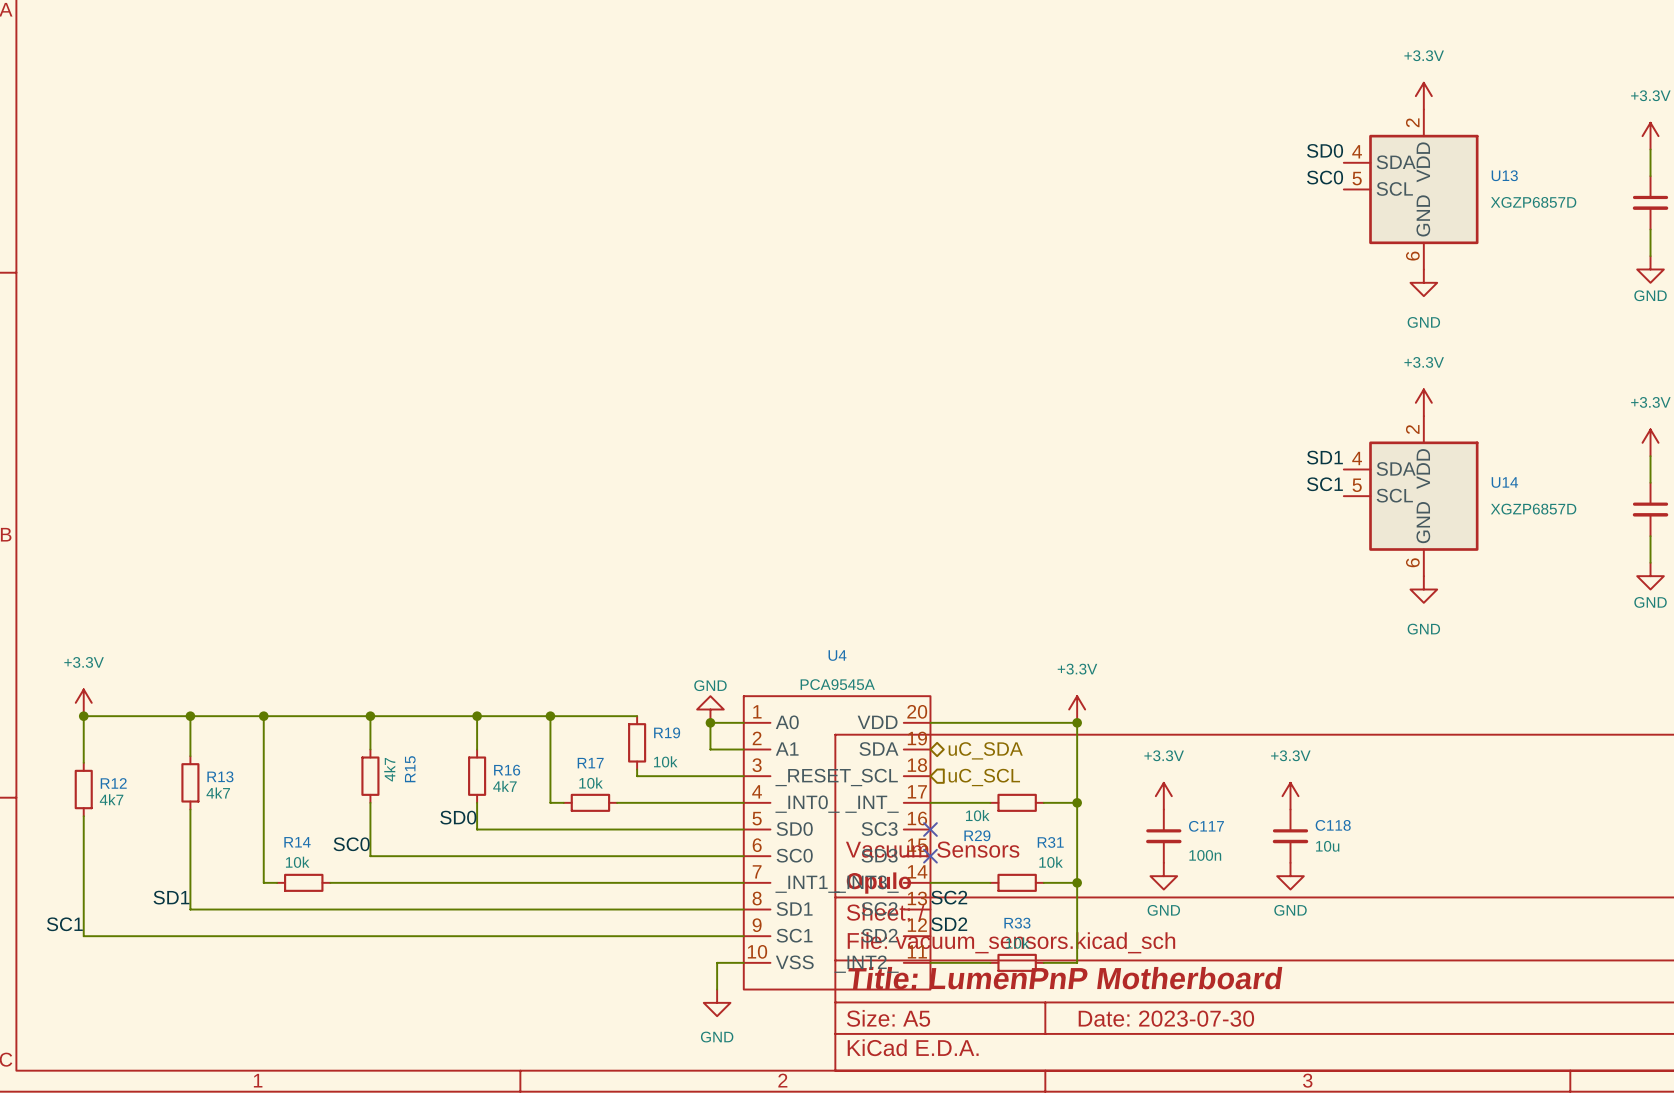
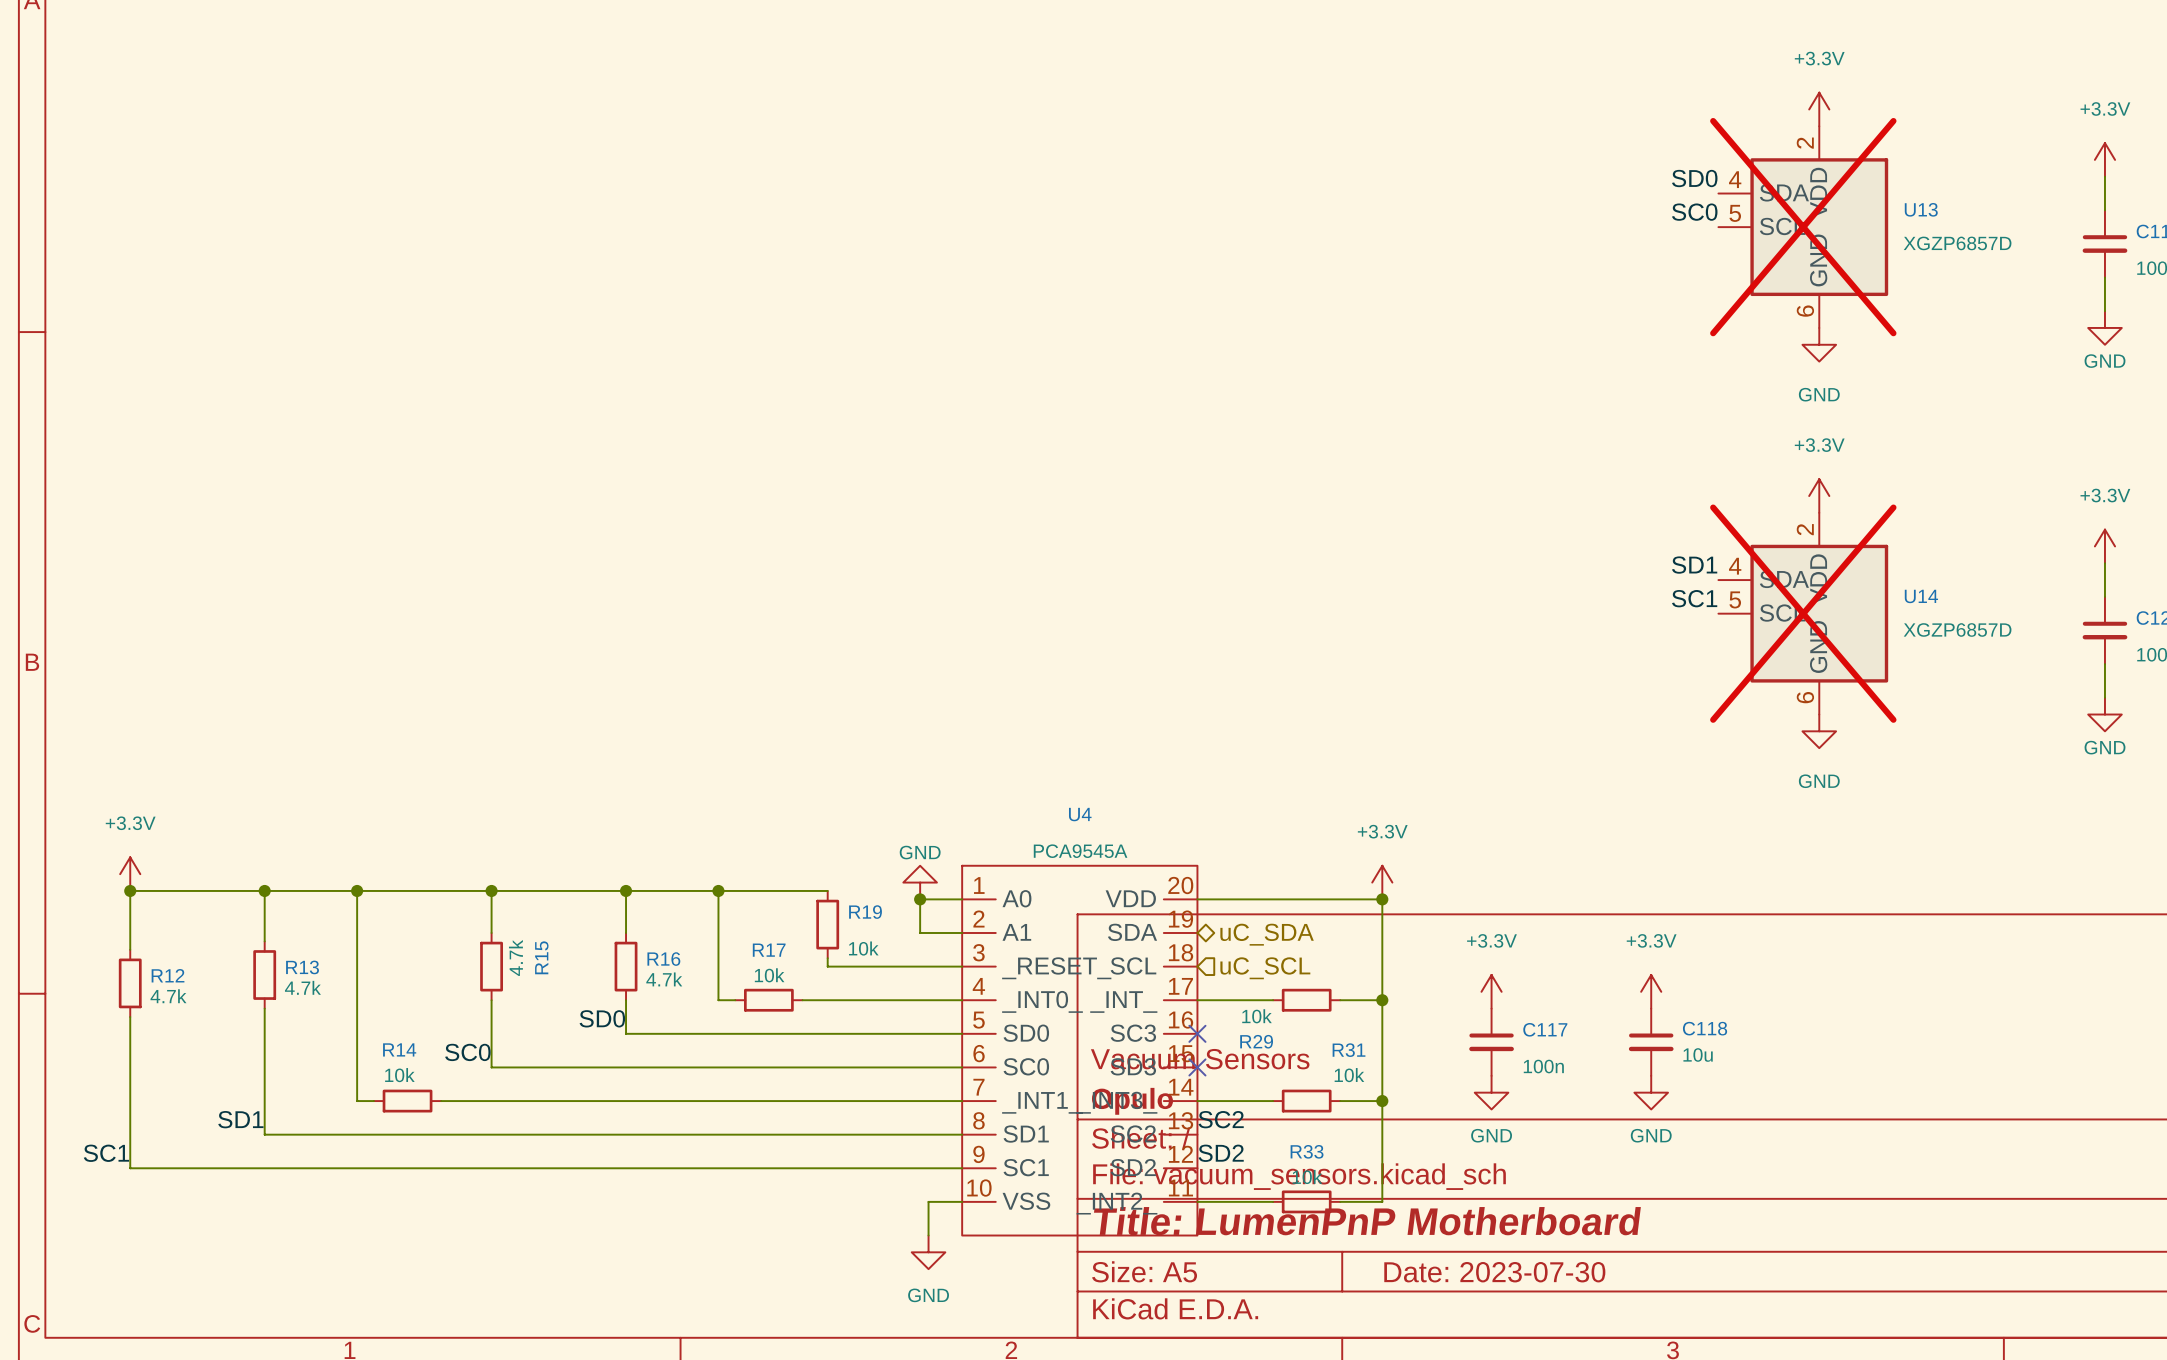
U13 do-not-place cross: none -> (1803, 227)
U14 do-not-place cross: none -> (1803, 613)
R15 value: 4k7 (389, 769) -> 4.7k (515, 957)
R16 value: 4k7 (504, 786) -> 4.7k (664, 979)
R13 value: 4k7 (218, 793) -> 4.7k (302, 987)
R12 value: 4k7 (111, 799) -> 4.7k (168, 996)

